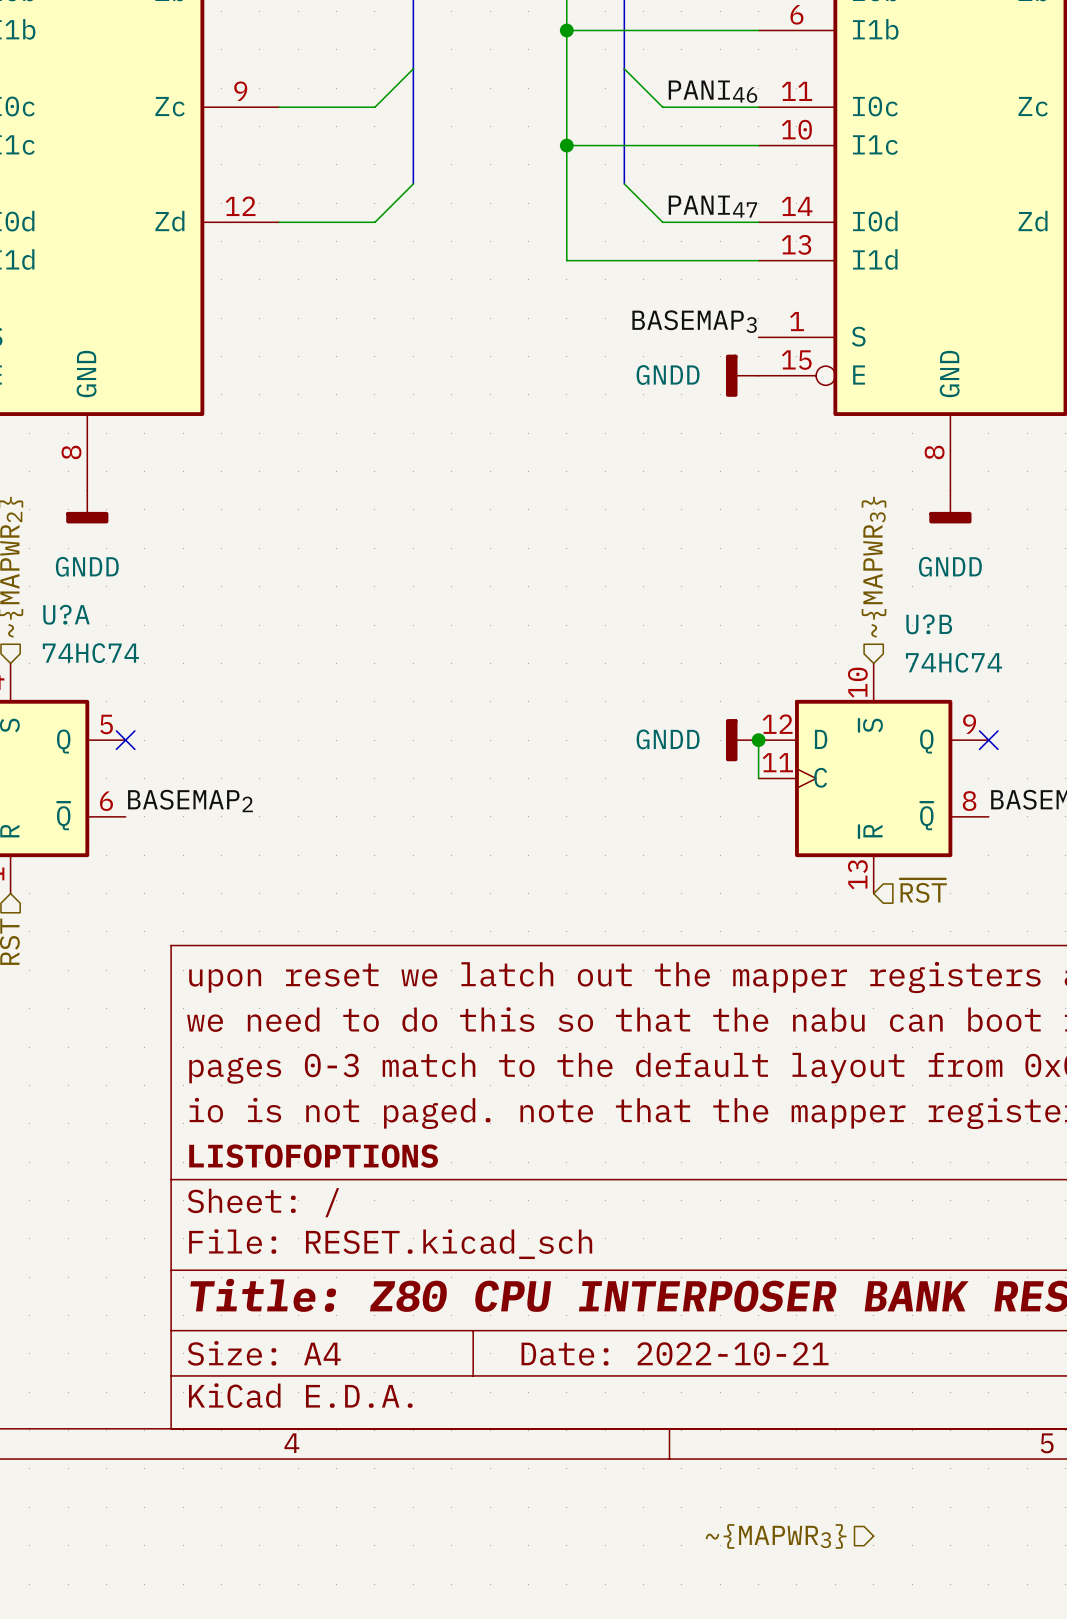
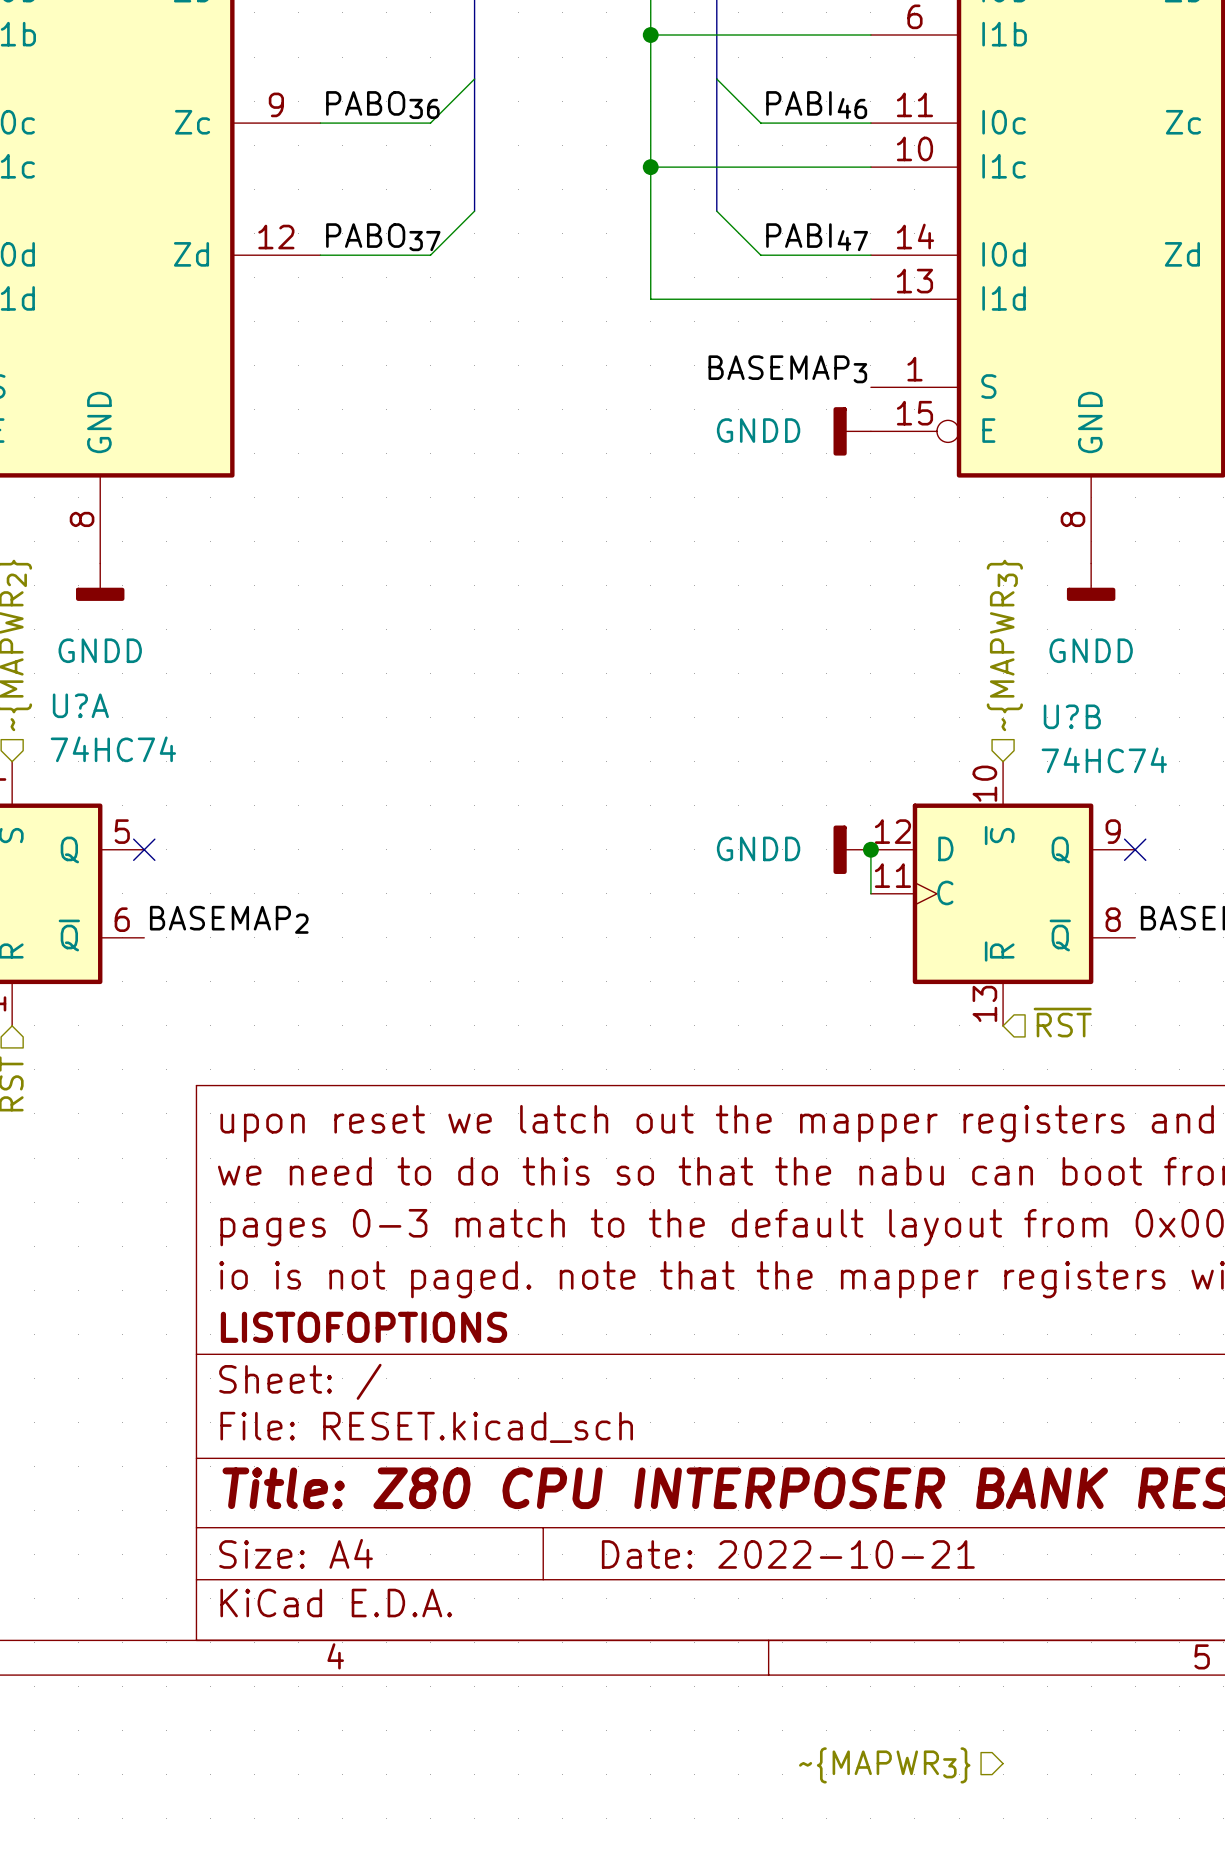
label: none -> PABO36 (382, 105)
label: PANI46 (712, 91) -> PABI46 (816, 105)
label: none -> PABO37 (383, 237)
label: PANI47 (712, 206) -> PABI47 (817, 237)

